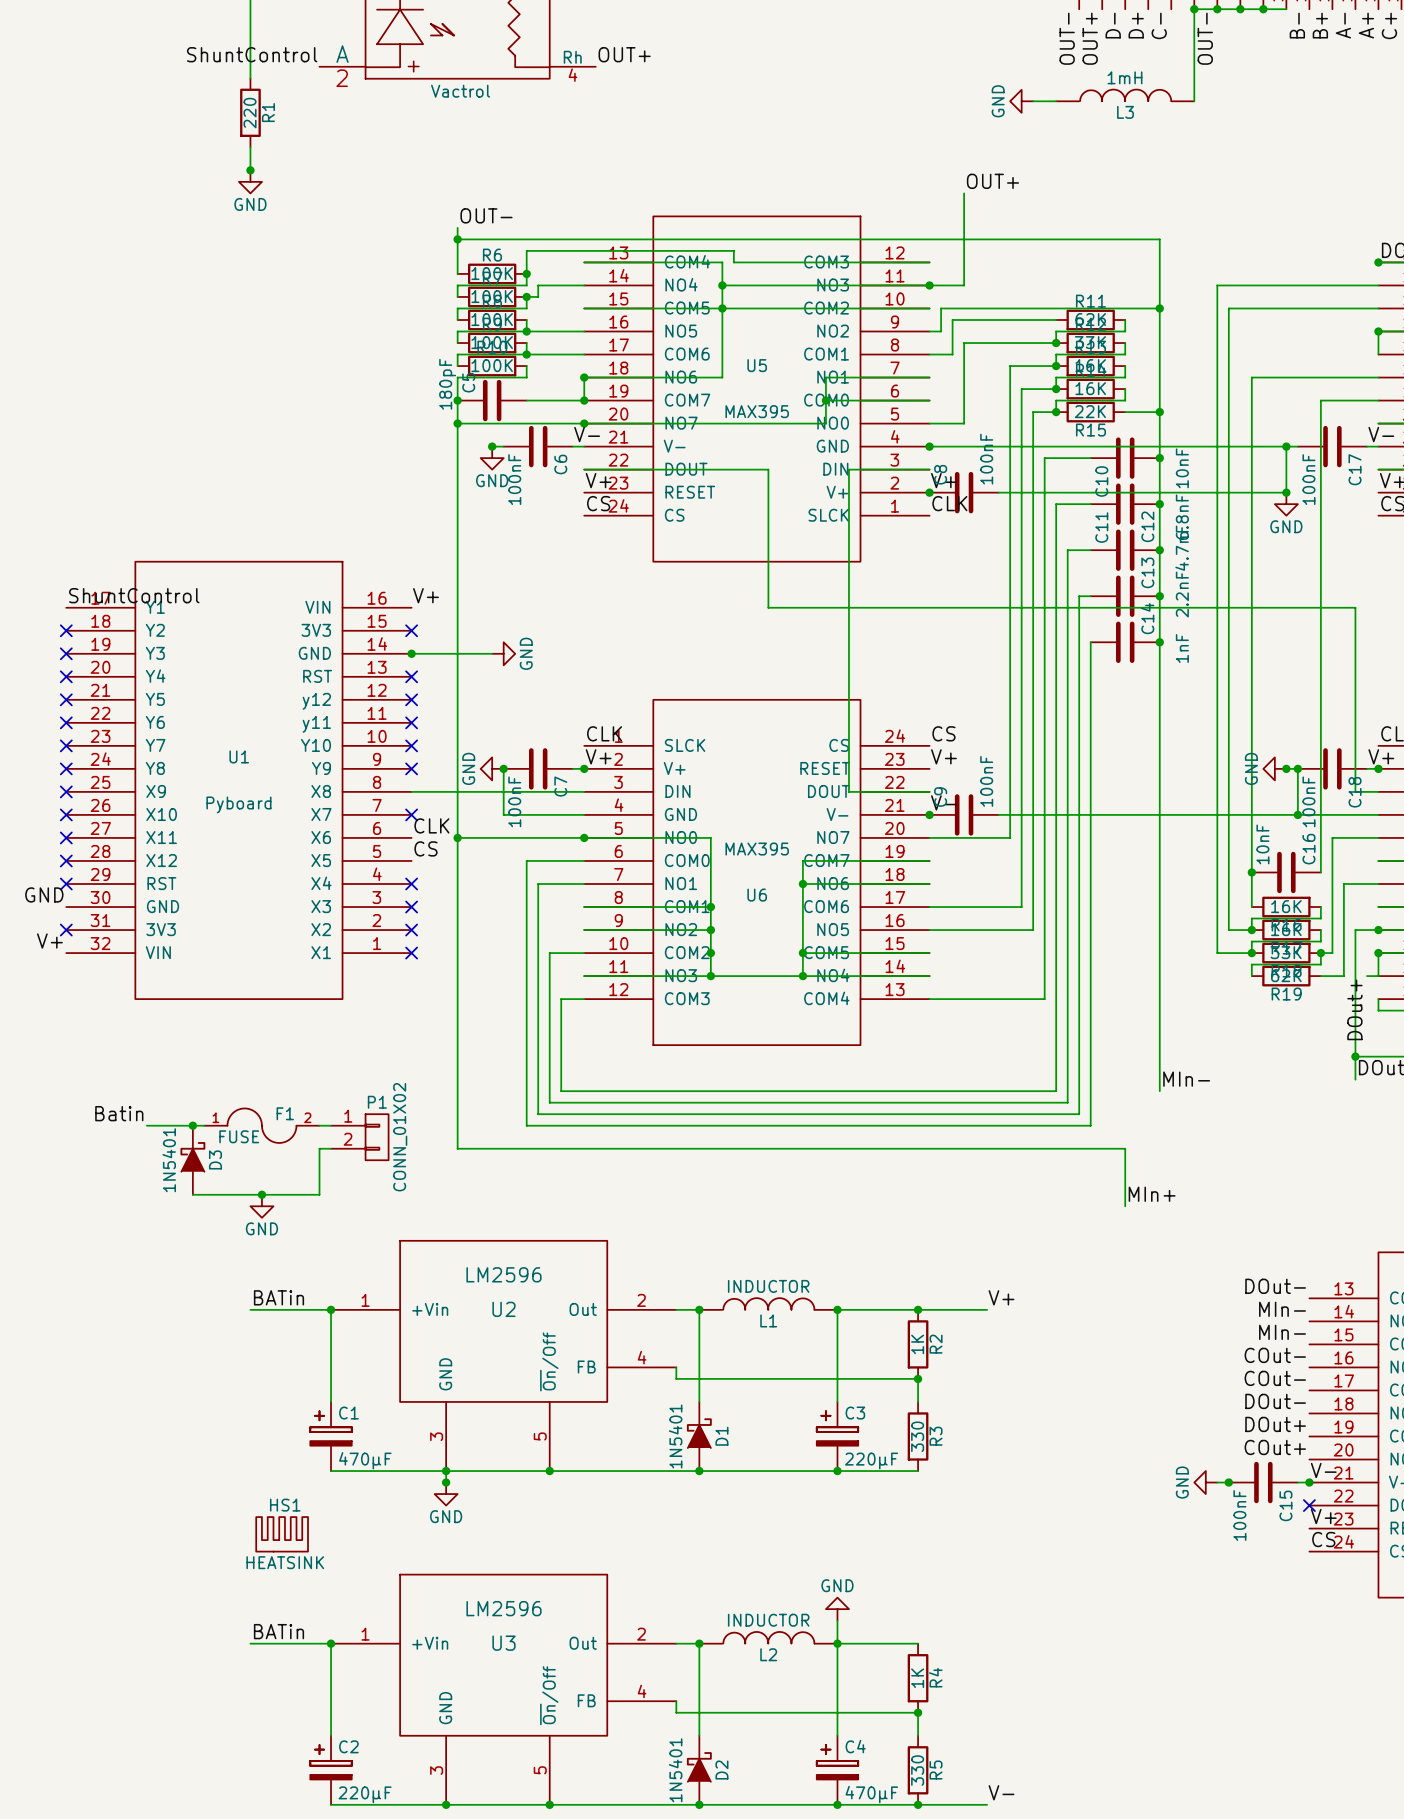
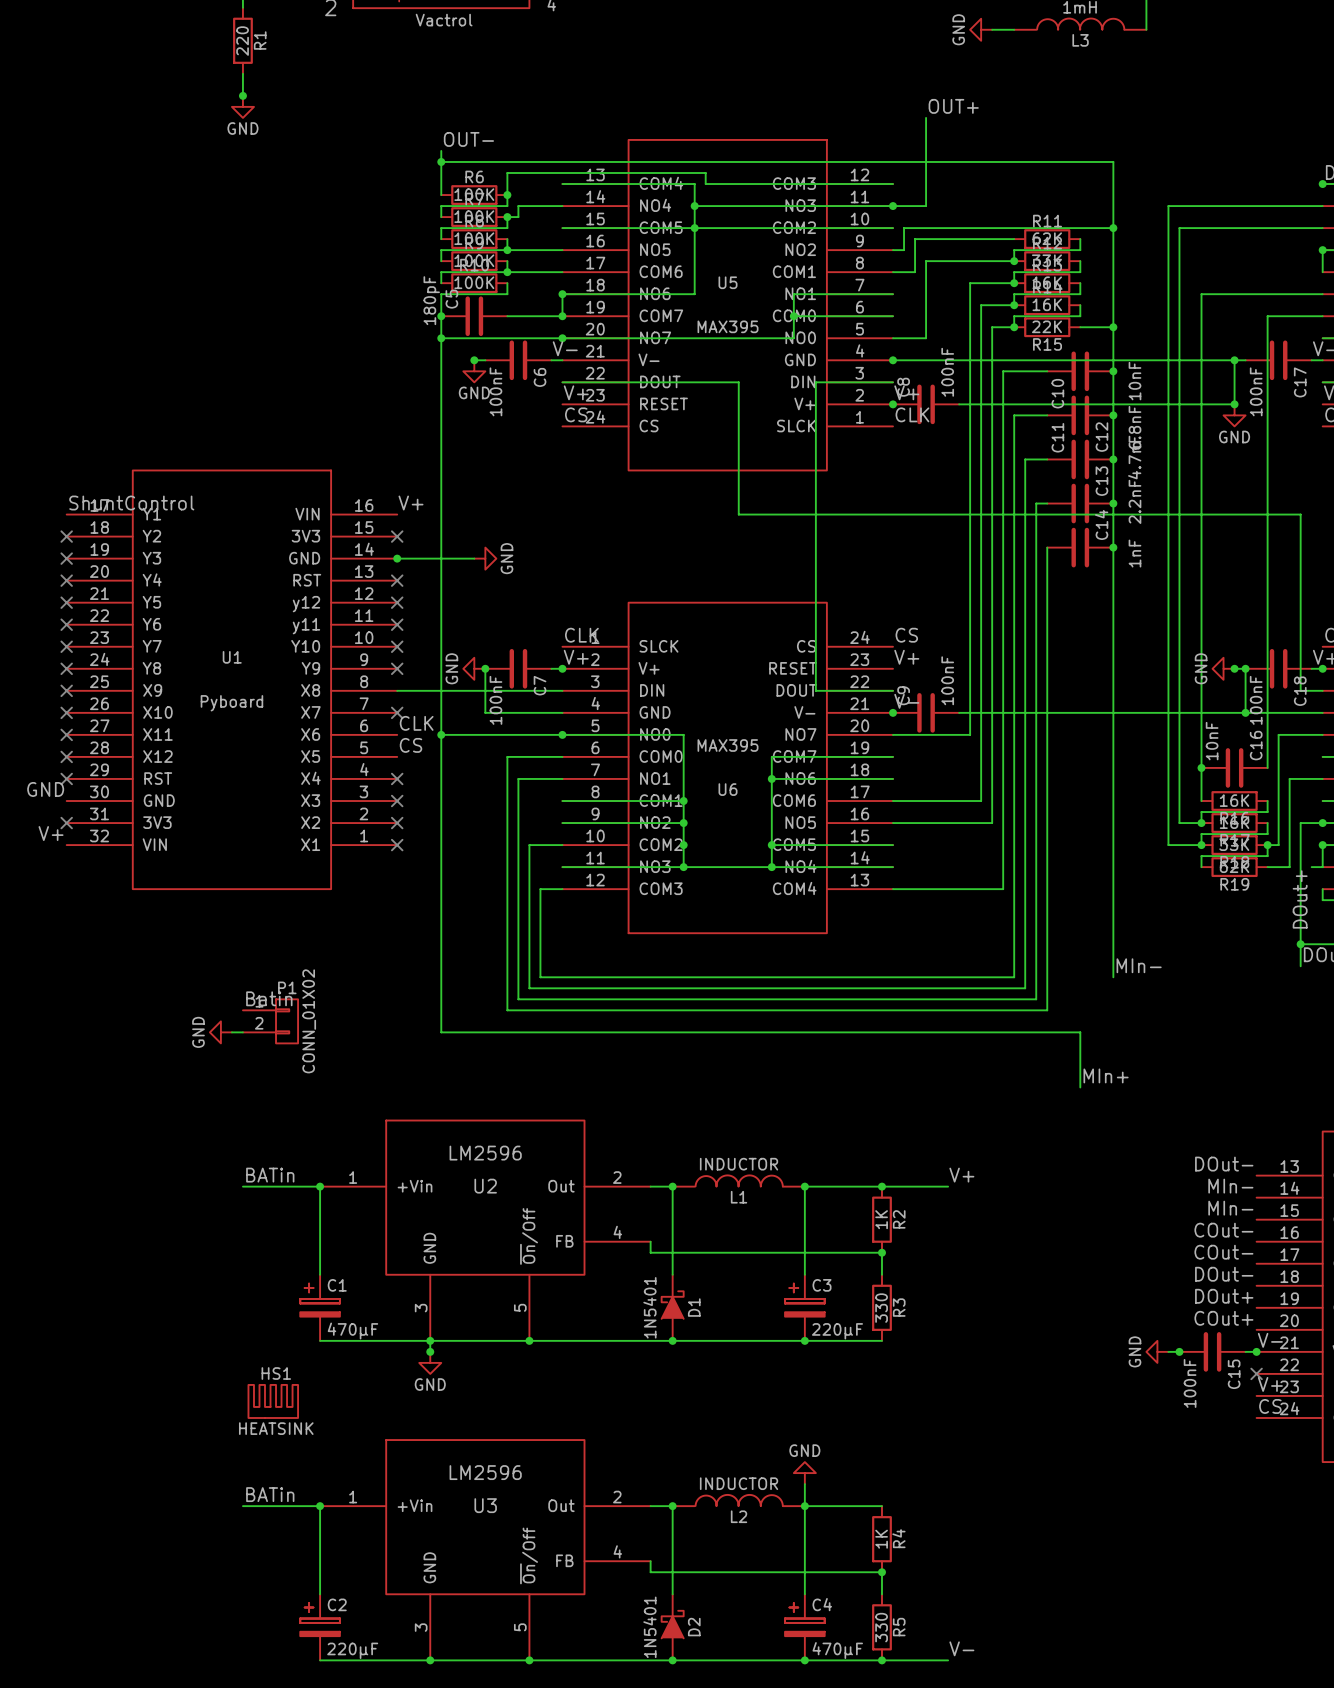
label position: Batin (119, 1113) -> Batin (269, 998)
wire: (146, 1125) (204, 1125) -> none
junction: (192, 1125) -> none
F1: FUSE (261, 1125) -> none
wire: (319, 1125) (331, 1125) -> (231, 1032) (242, 1032)
P1 position: (359, 1137) -> (270, 1021)
wire: (331, 1148) (319, 1148) (319, 1194) (192, 1194) -> none
D3: 1N5401 (192, 1160) -> none
junction: (261, 1194) -> none
power symbol rotation: 0° (261, 1206) -> 90° clockwise (220, 1032)
power symbol position: GND (261, 1206) -> GND (220, 1032)

